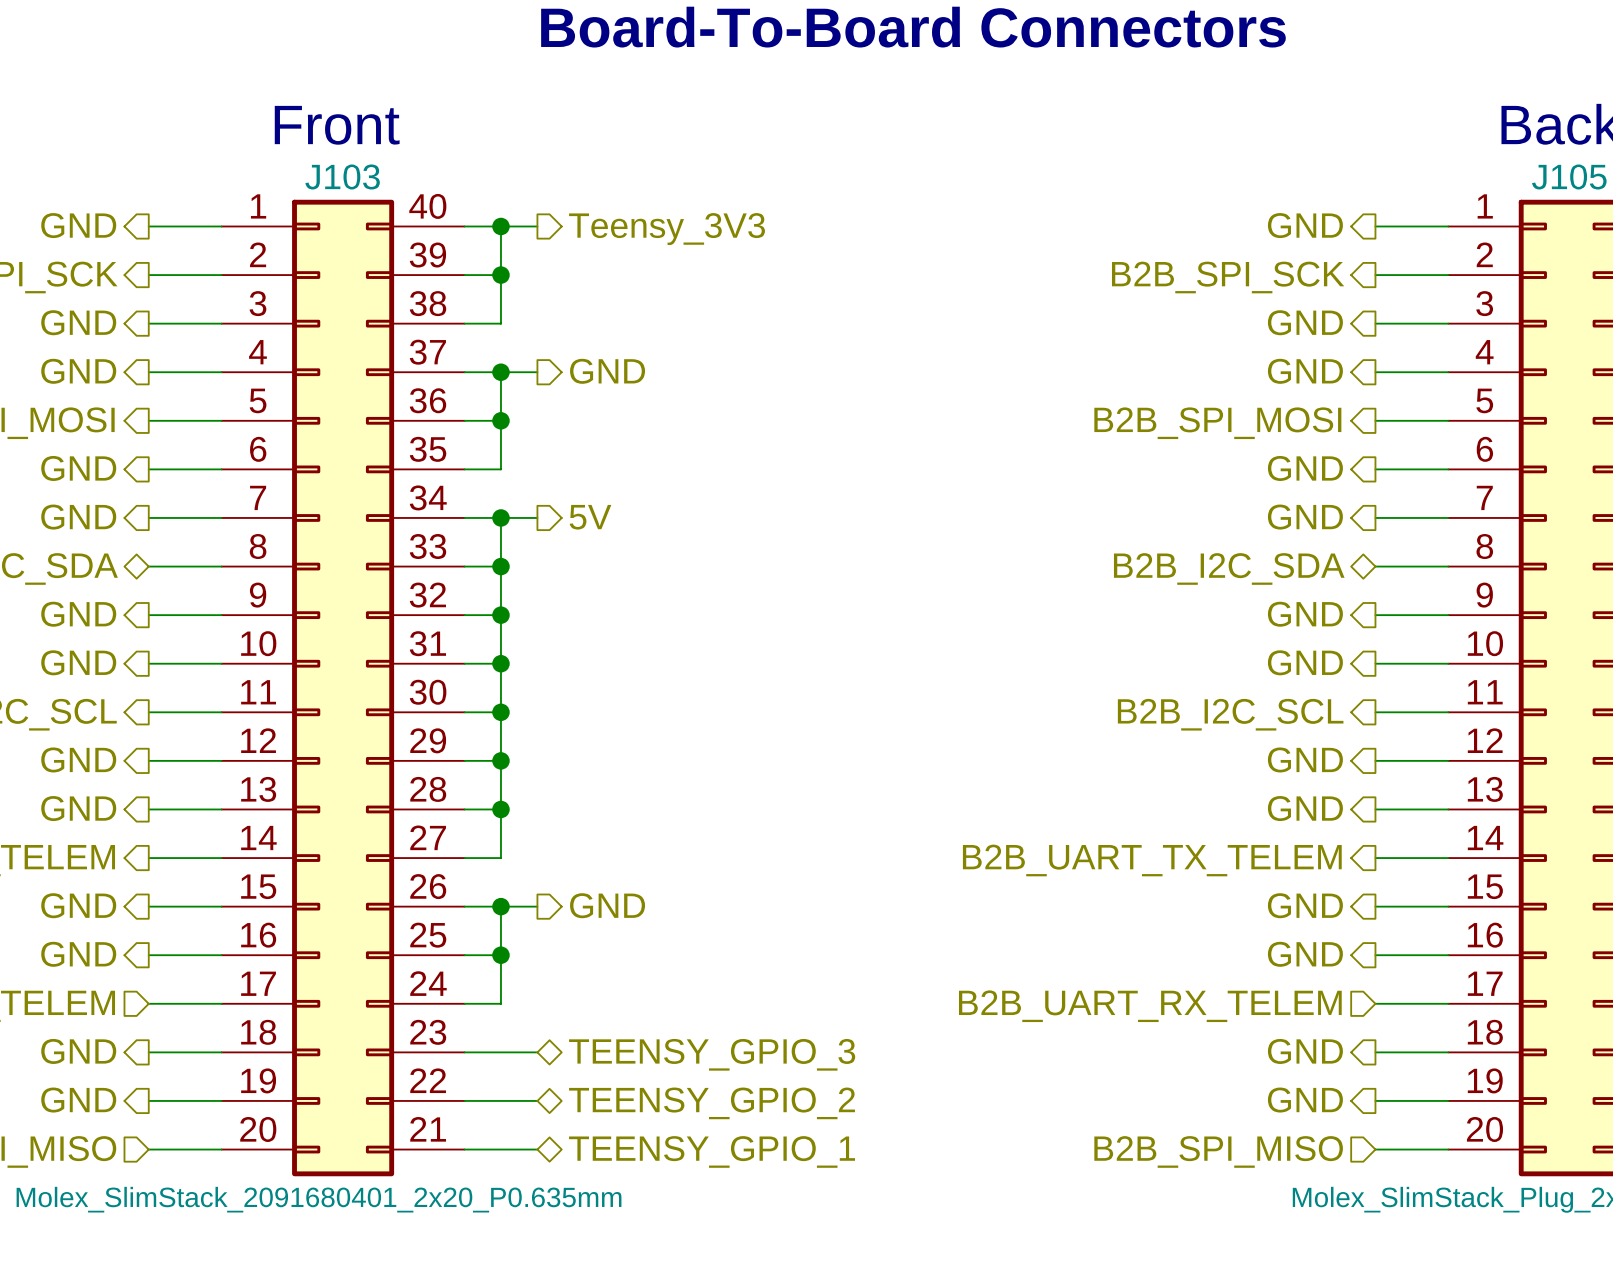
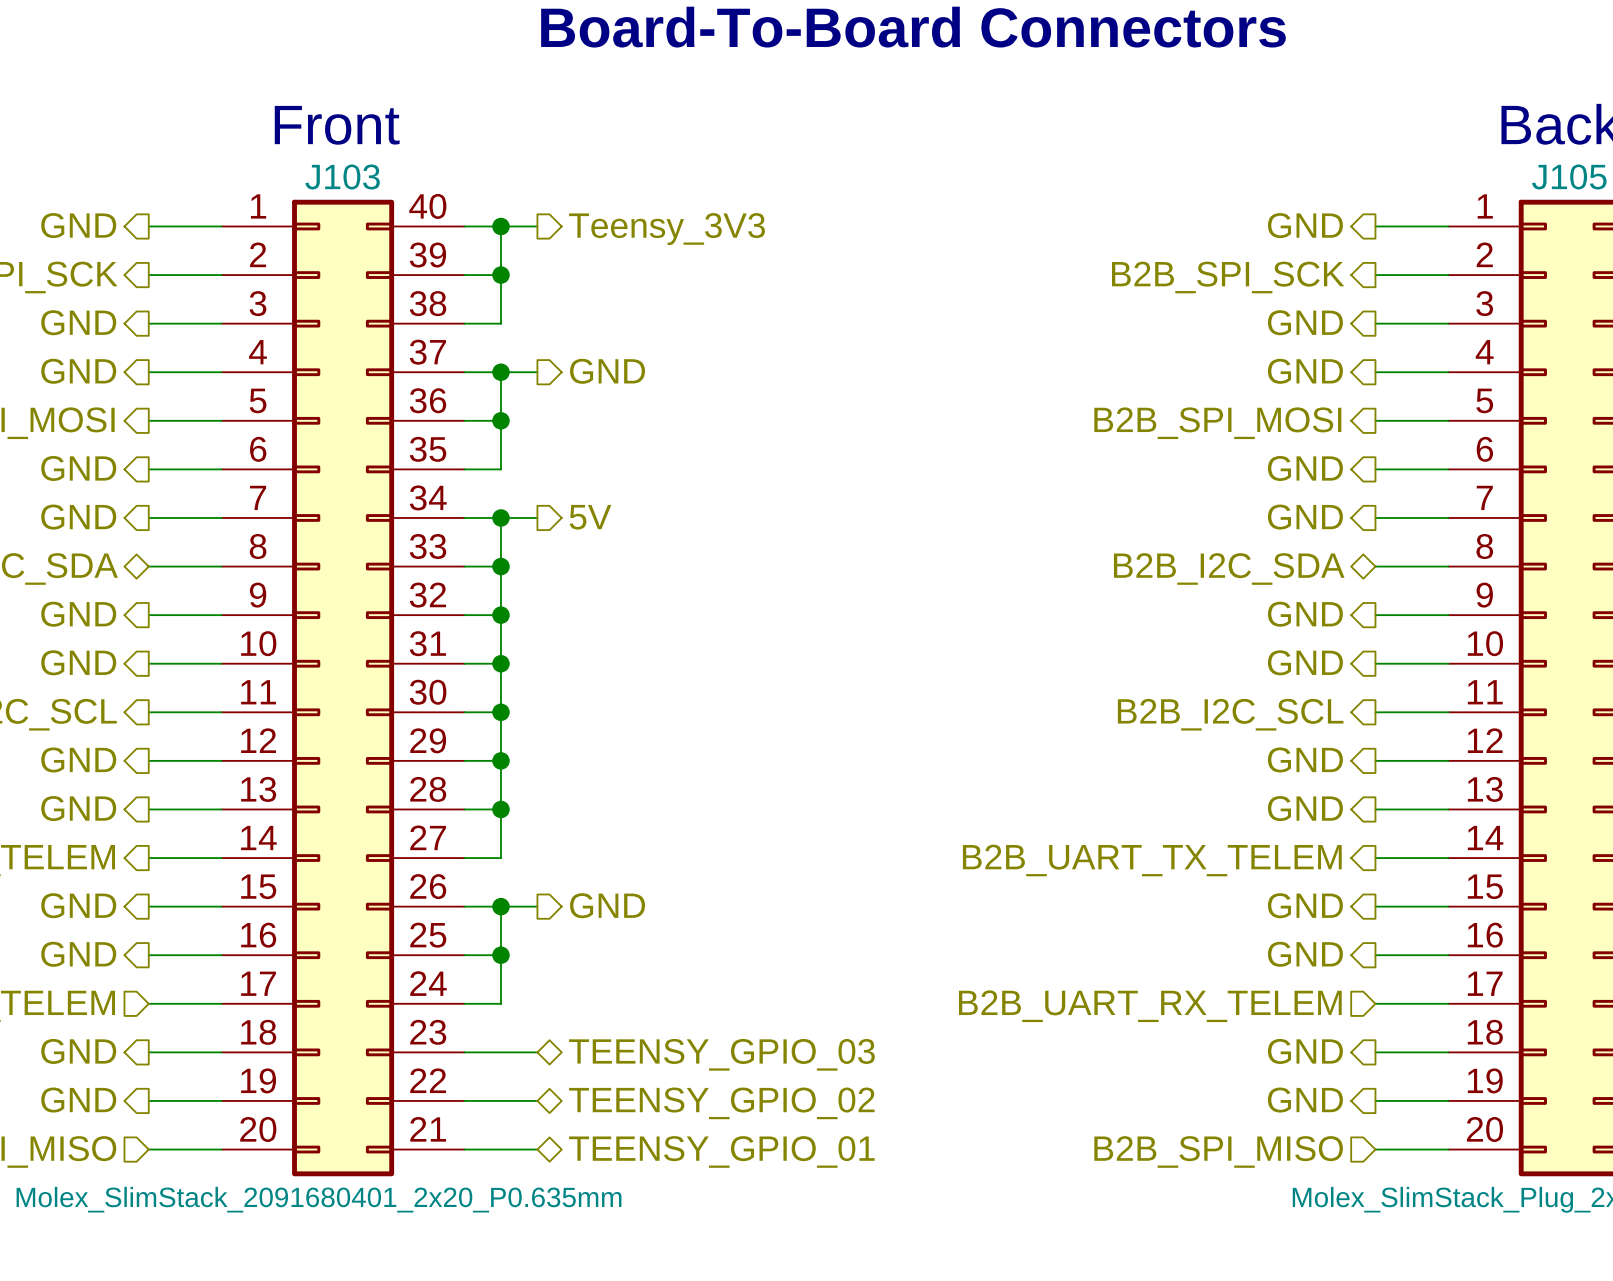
hierarchical label: TEENSY_GPIO_3 (712, 1054) -> TEENSY_GPIO_03 (721, 1054)
hierarchical label: TEENSY_GPIO_2 (712, 1103) -> TEENSY_GPIO_02 (721, 1103)
hierarchical label: TEENSY_GPIO_1 (712, 1151) -> TEENSY_GPIO_01 (721, 1151)

